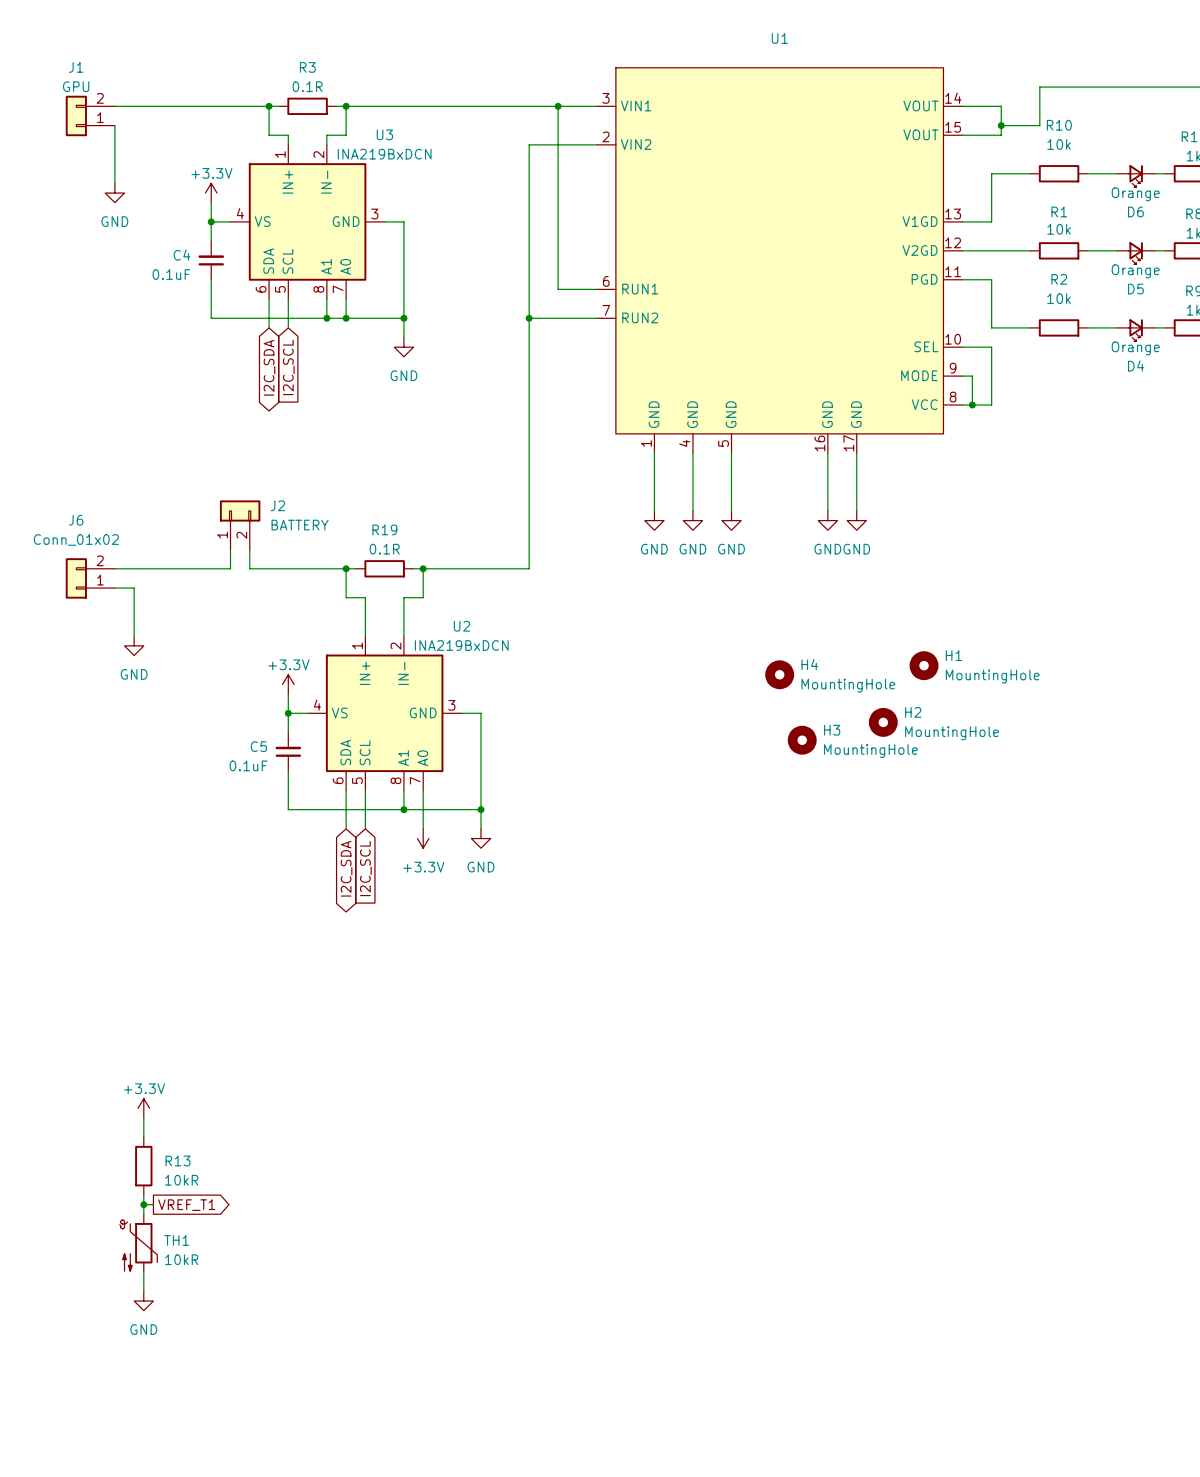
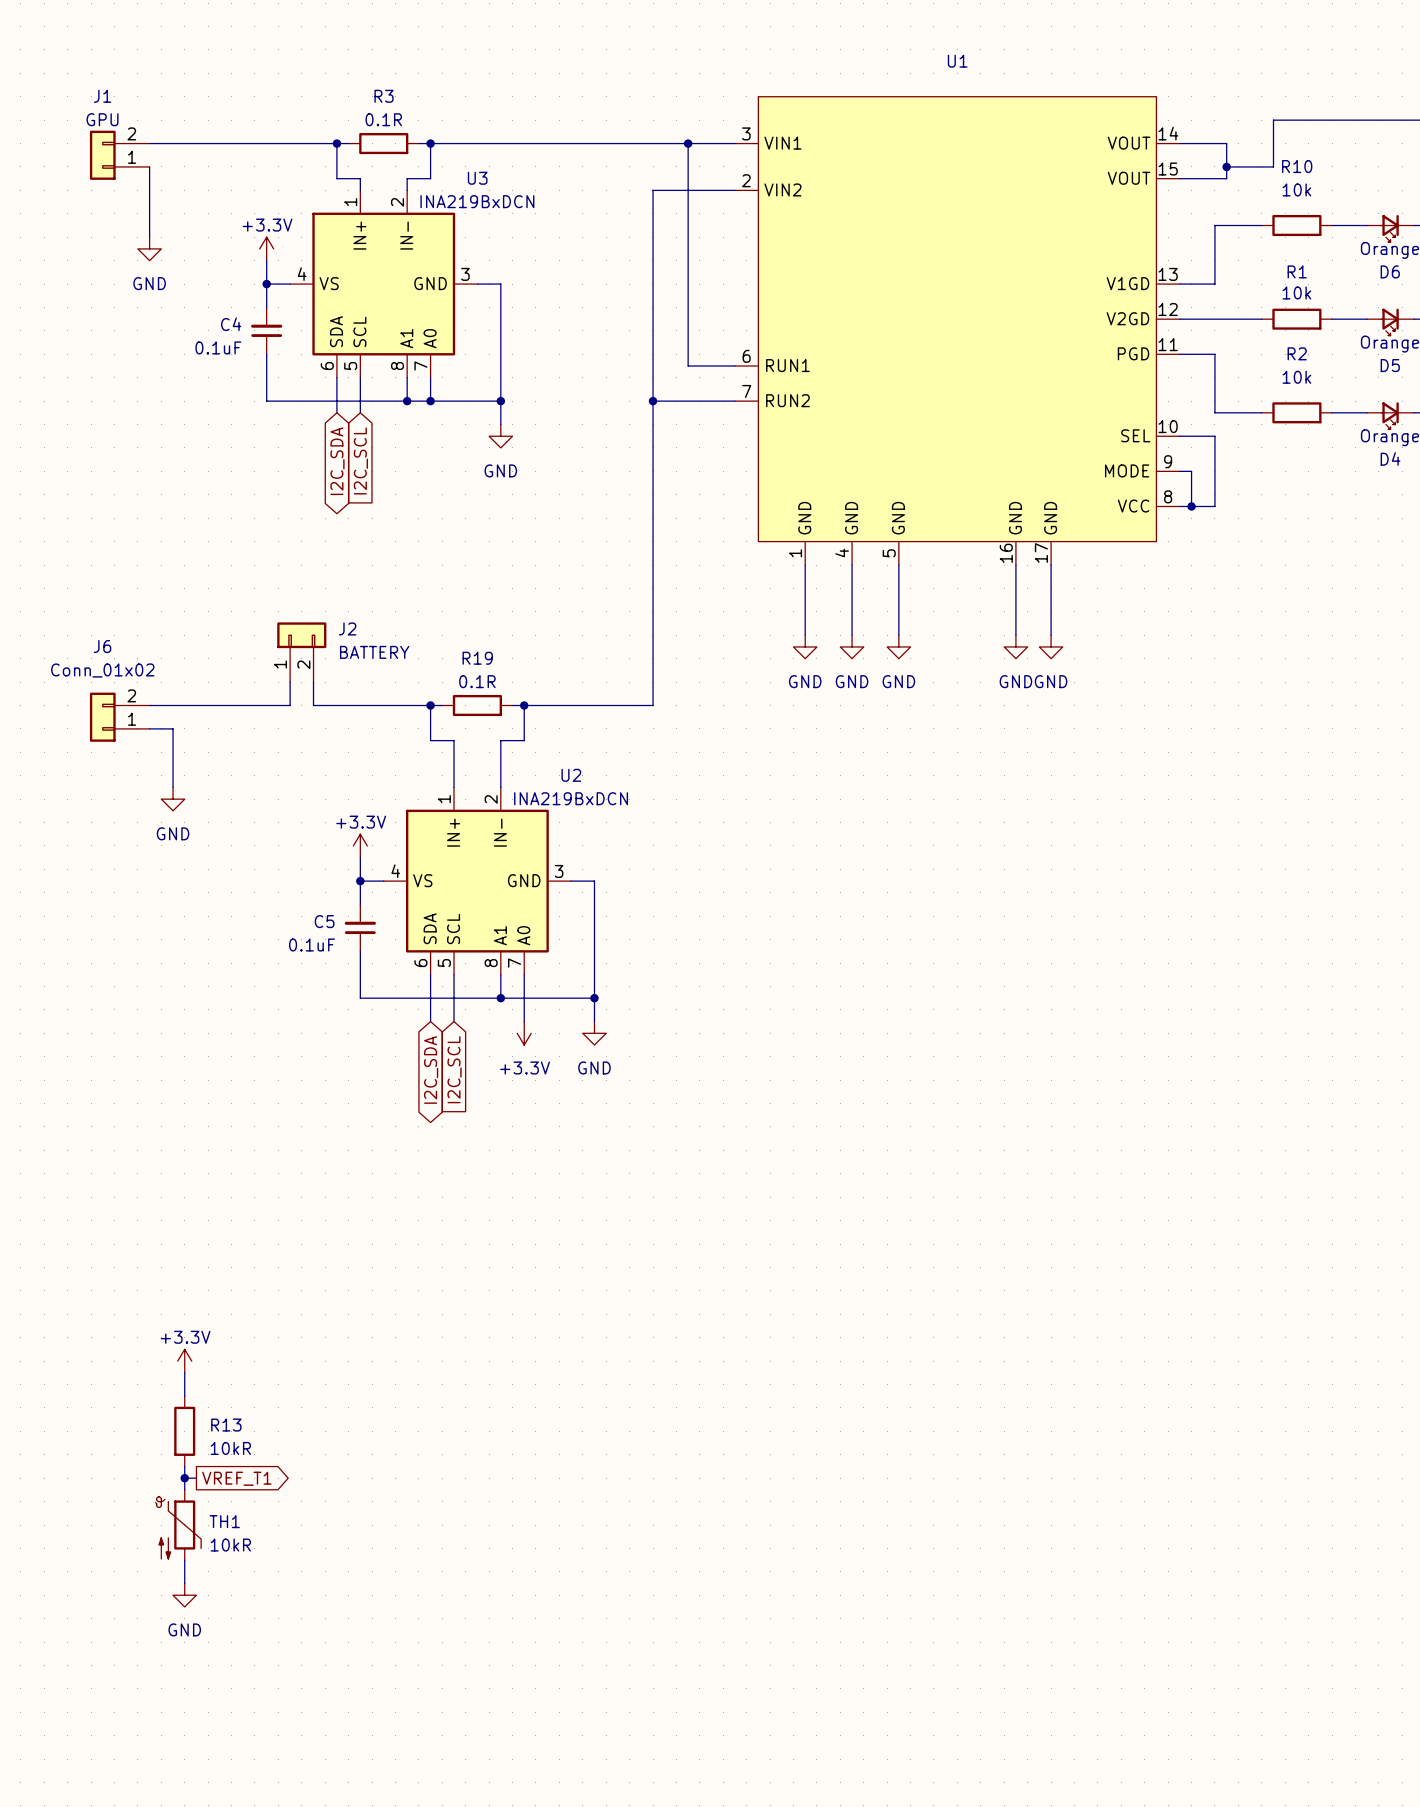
H1: MountingHole (924, 665) -> none
H4: MountingHole (779, 674) -> none
H2: MountingHole (883, 722) -> none
H3: MountingHole (802, 740) -> none

